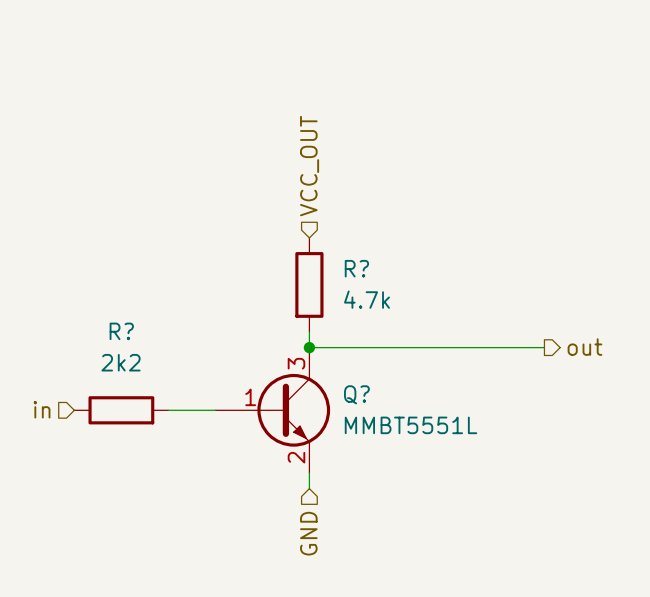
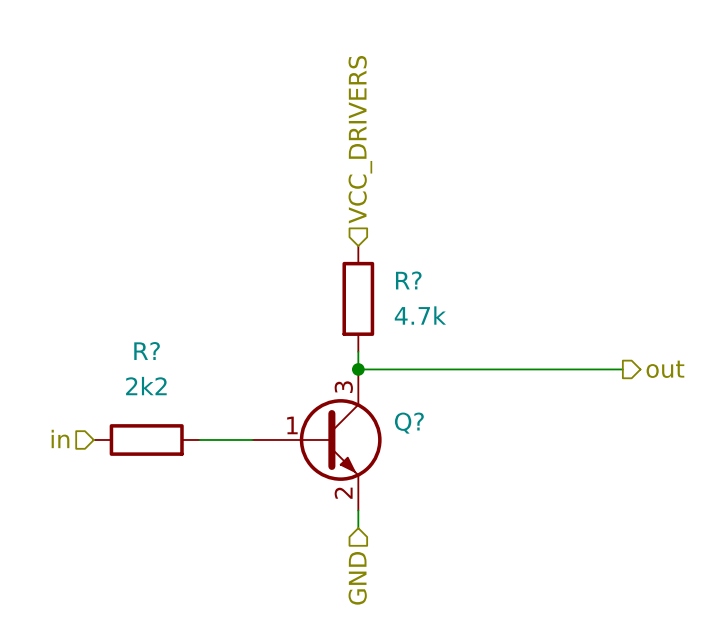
hierarchical label: VCC_OUT (309, 166) -> VCC_DRIVERS (360, 139)
Q? value: MMBT5551L (411, 425) -> none

